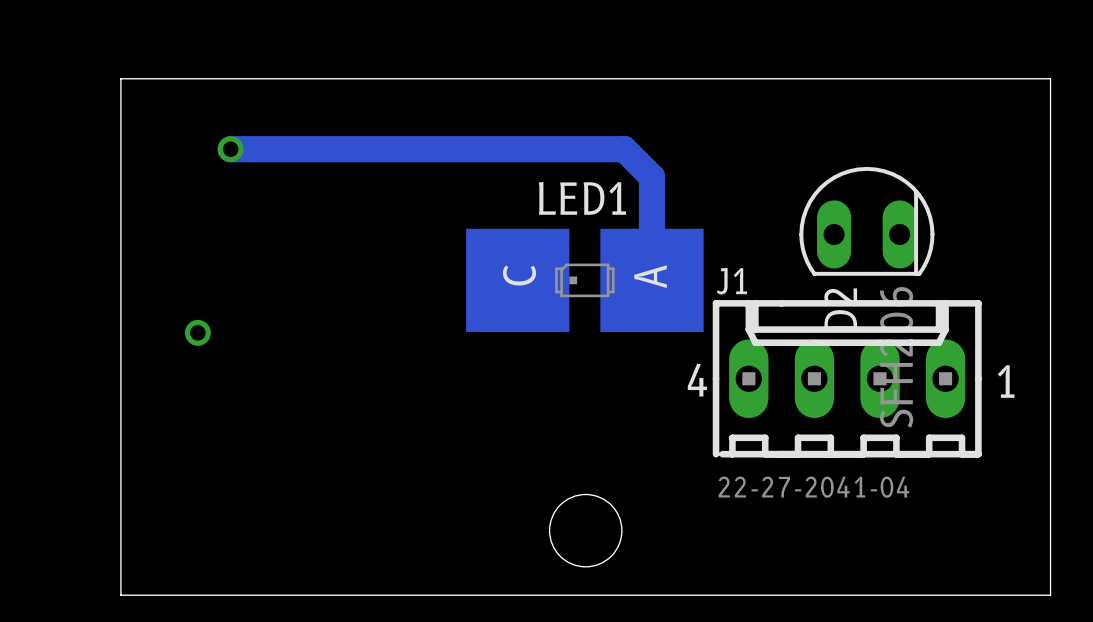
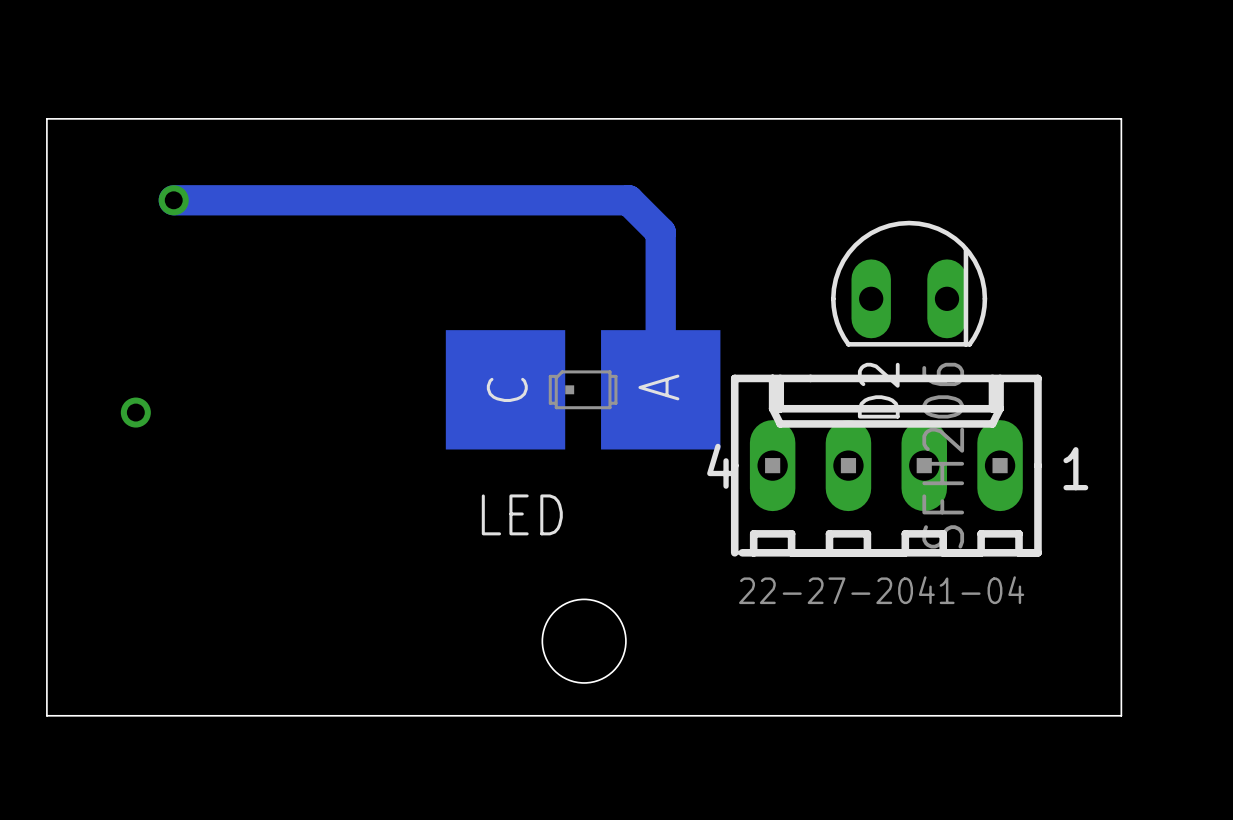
LED1: (584, 280) -> none
J1 name: J1 (731, 281) -> none
LED: none -> (583, 389)

